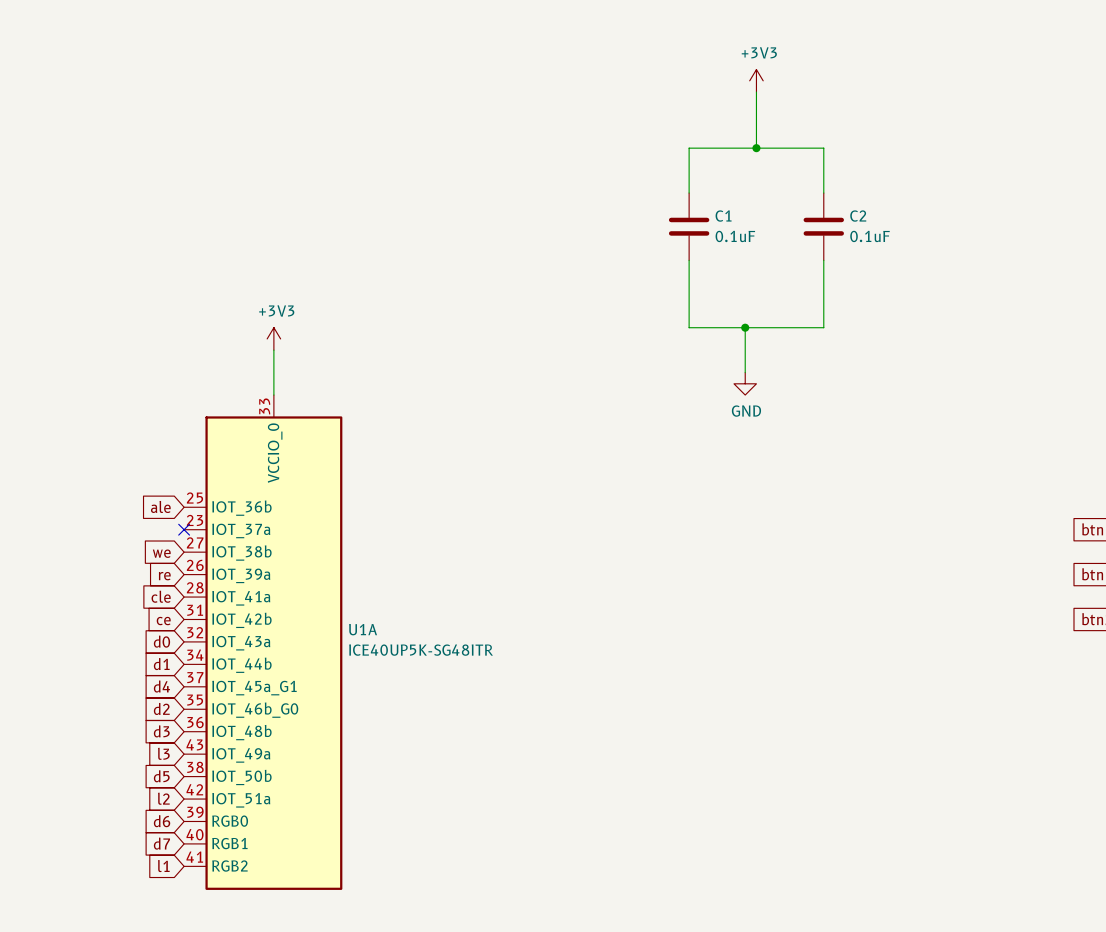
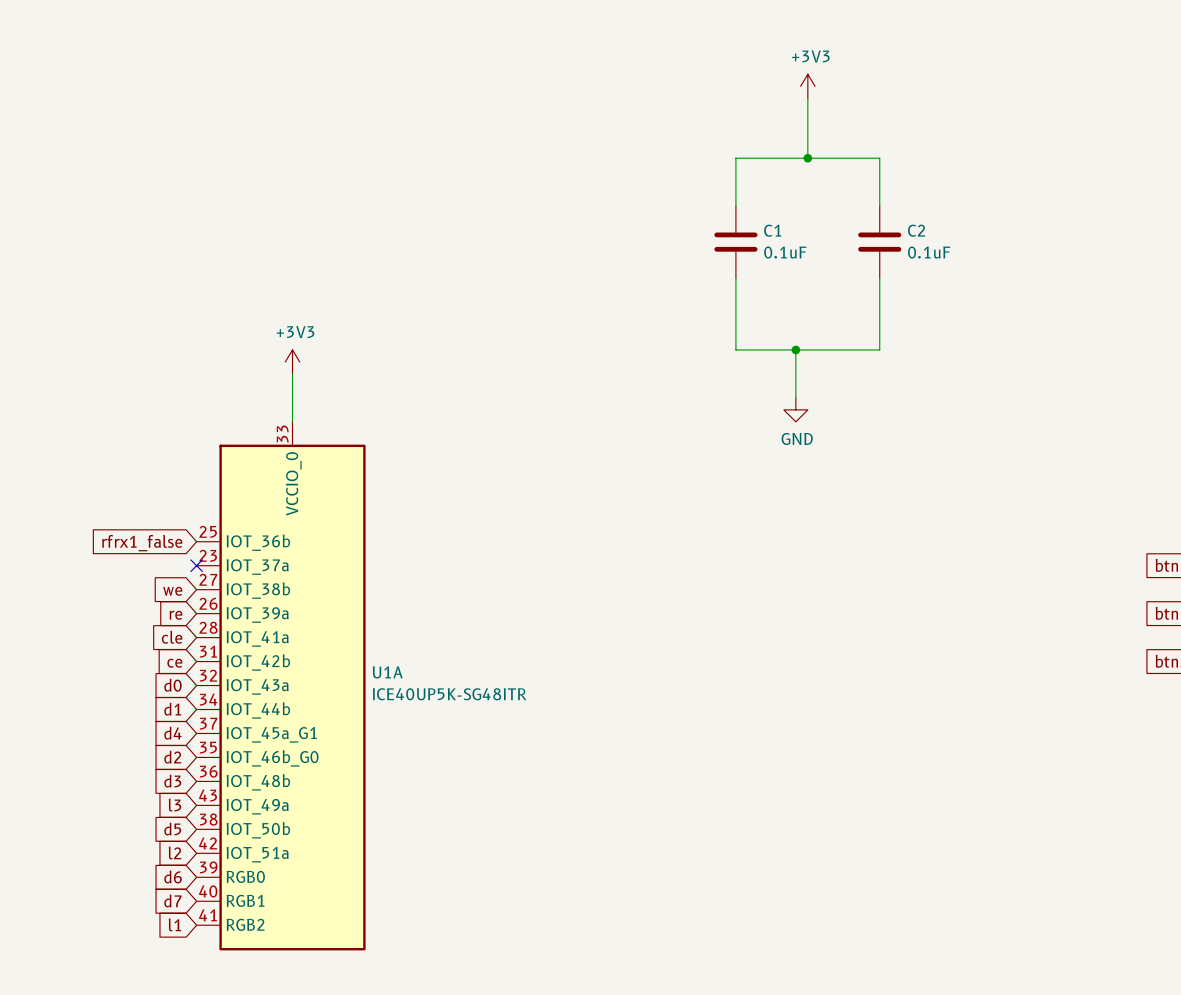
global label: ale (160, 506) -> rfrx1_false (142, 543)

